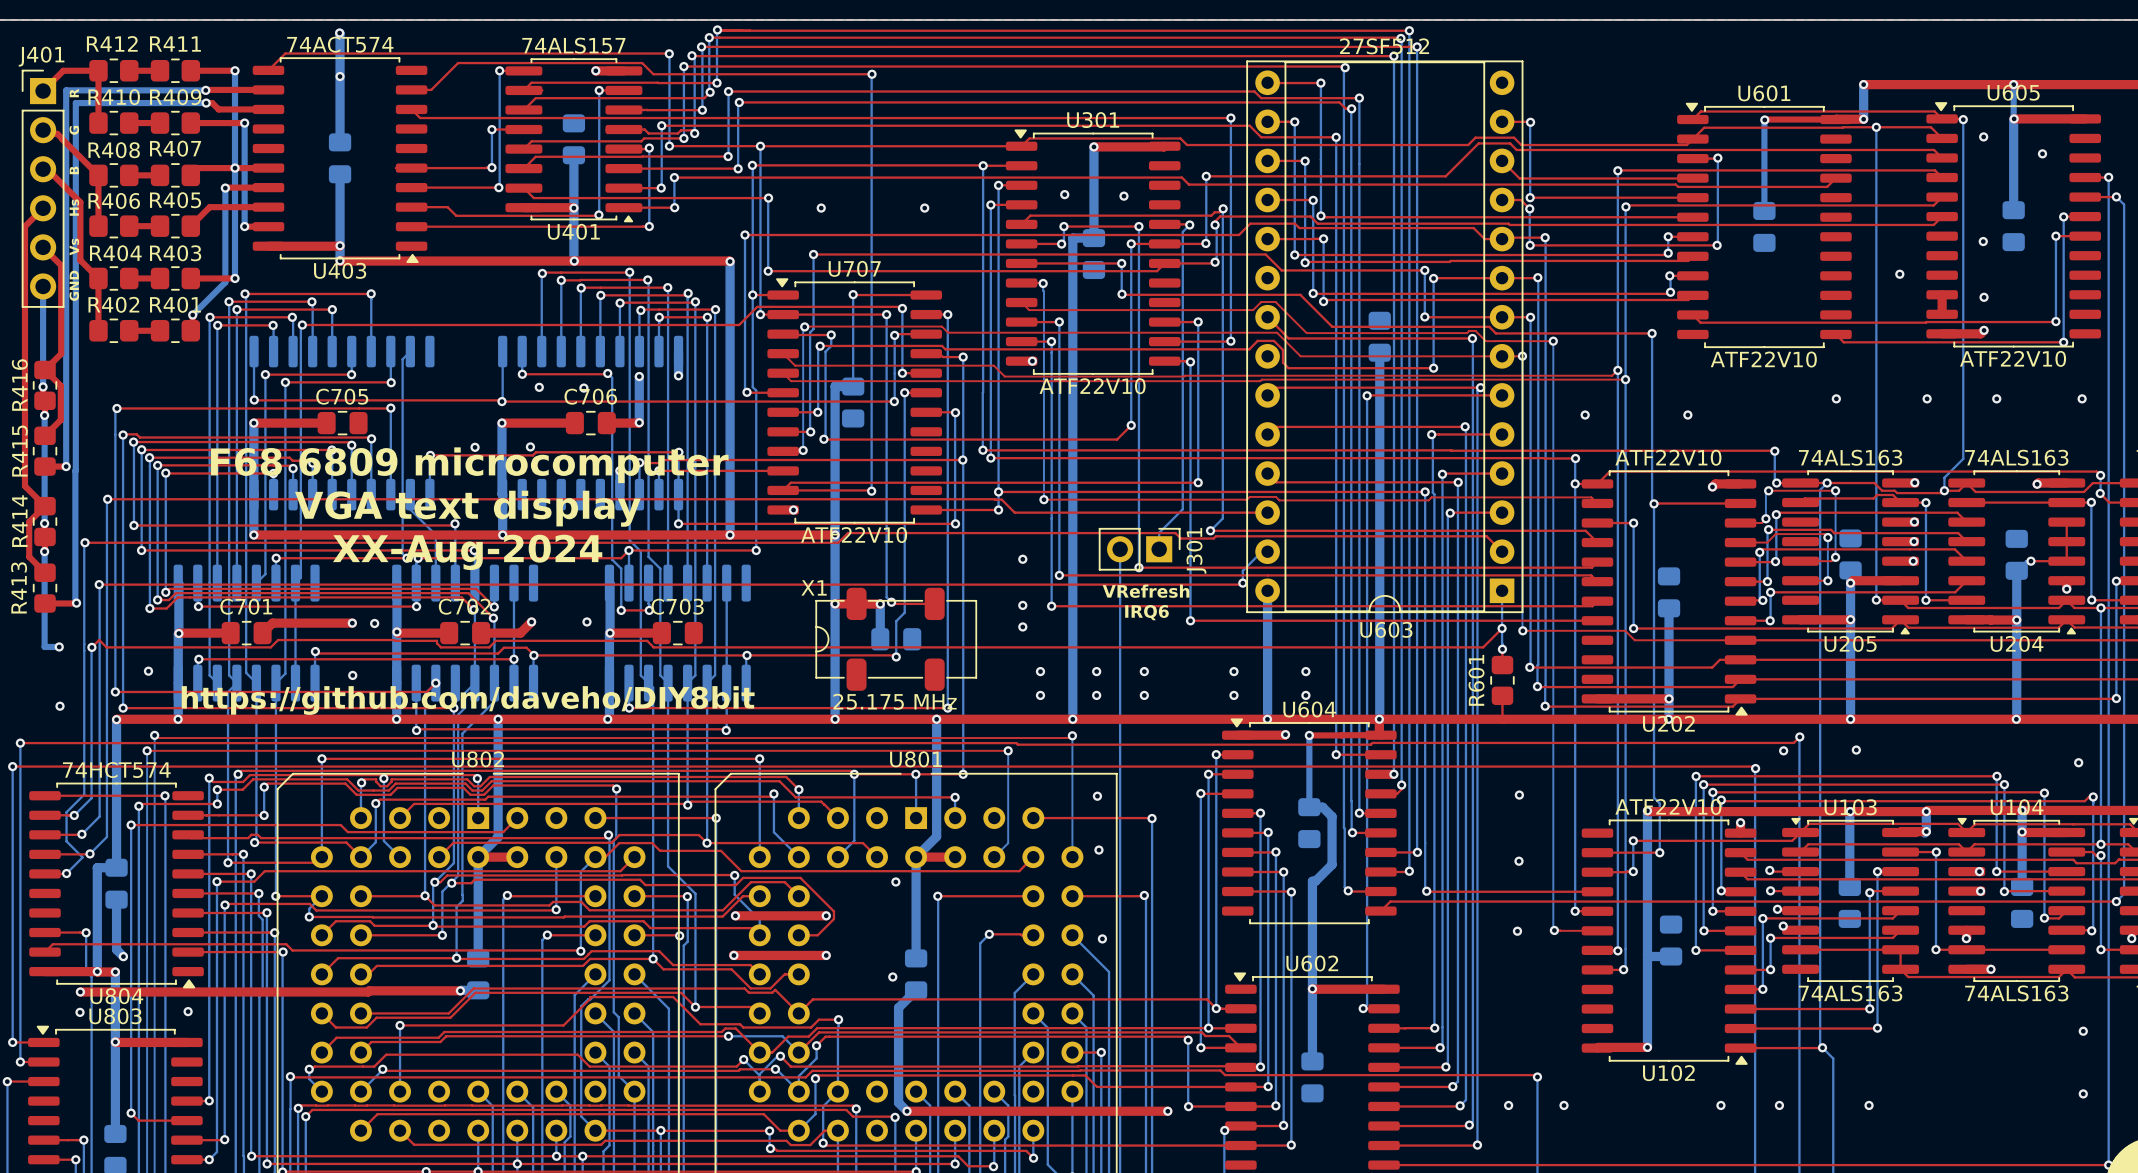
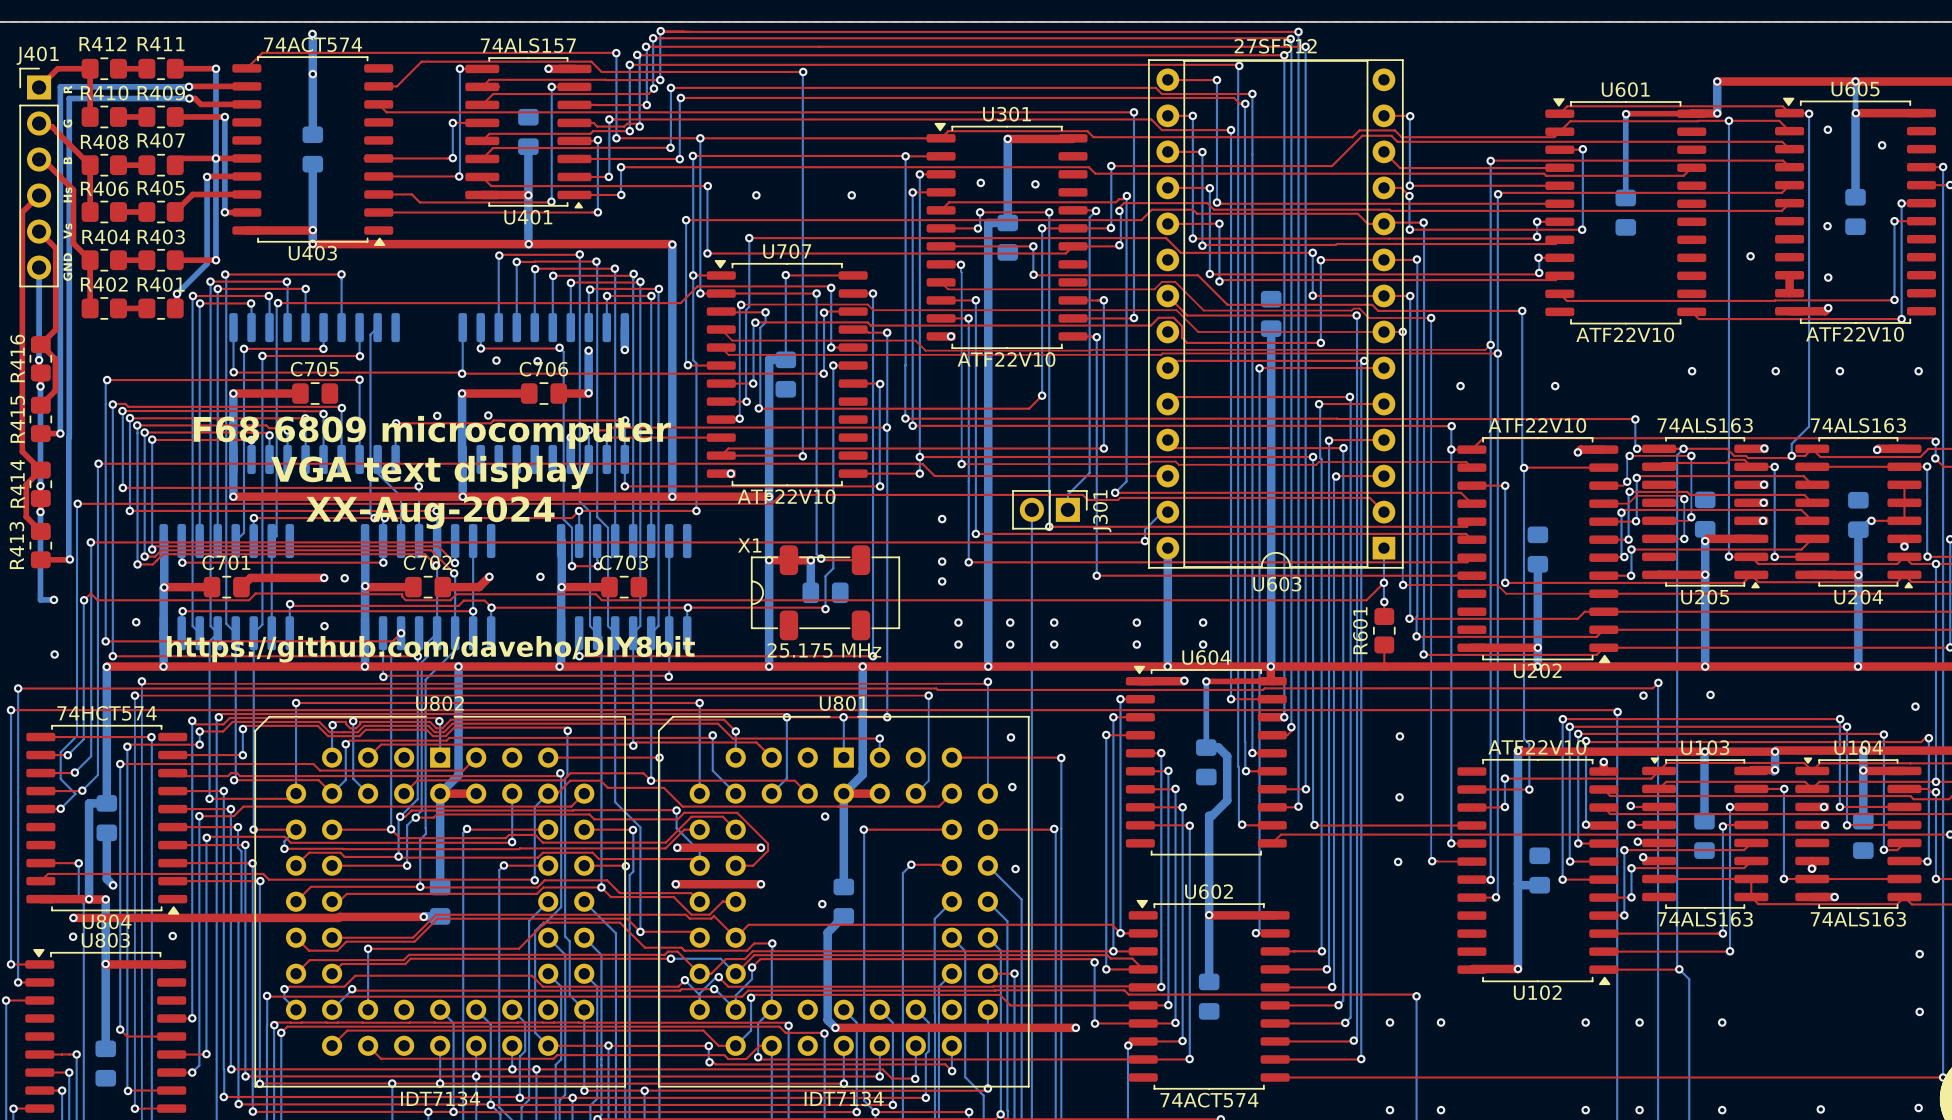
text: VRefresh (1146, 591) -> none
text: IRQ6 (1146, 612) -> none

